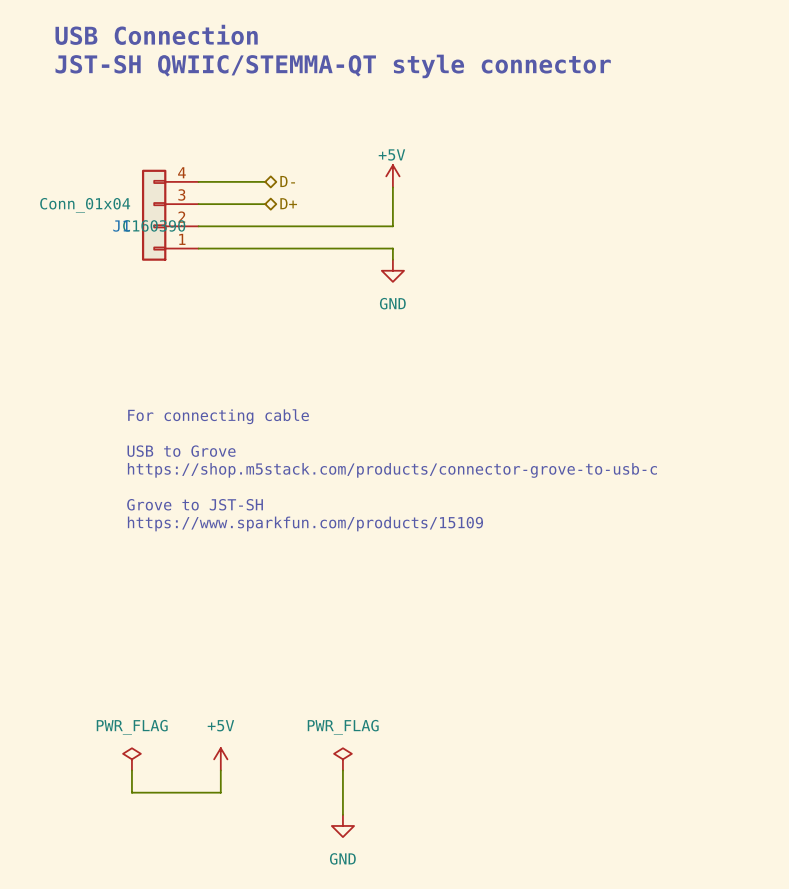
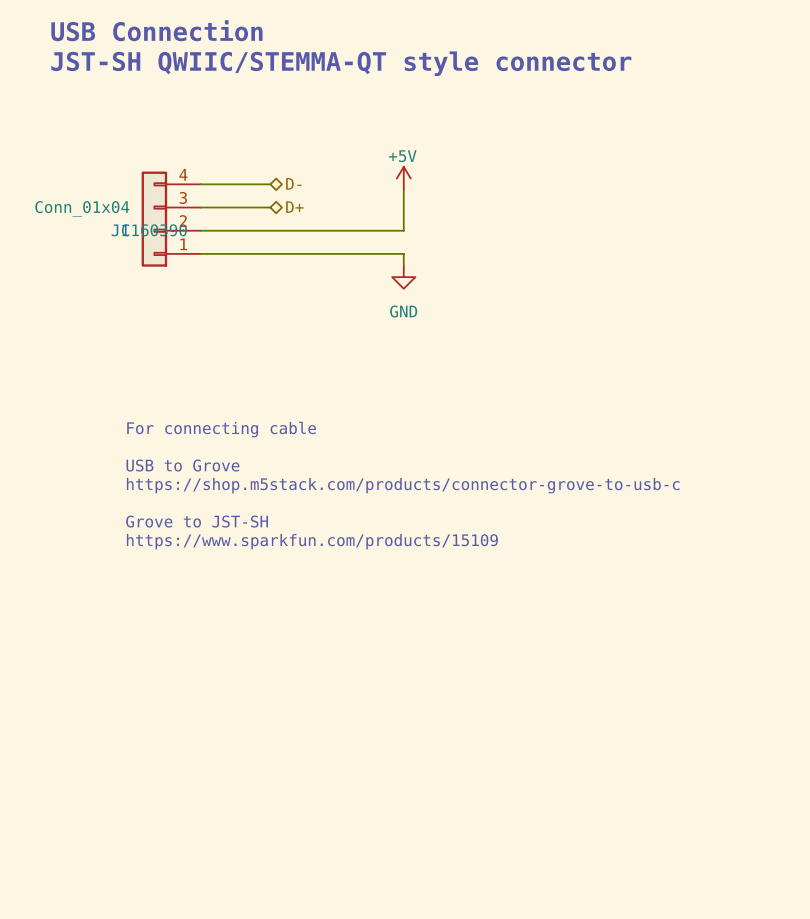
power symbol: PWR_FLAG (131, 759) -> none
power symbol: +5V (220, 759) -> none
power symbol: PWR_FLAG (342, 759) -> none
wire: (131, 770) (131, 792) (220, 792) (220, 770) -> none
wire: (342, 770) (342, 814) -> none
power symbol: GND (342, 825) -> none

